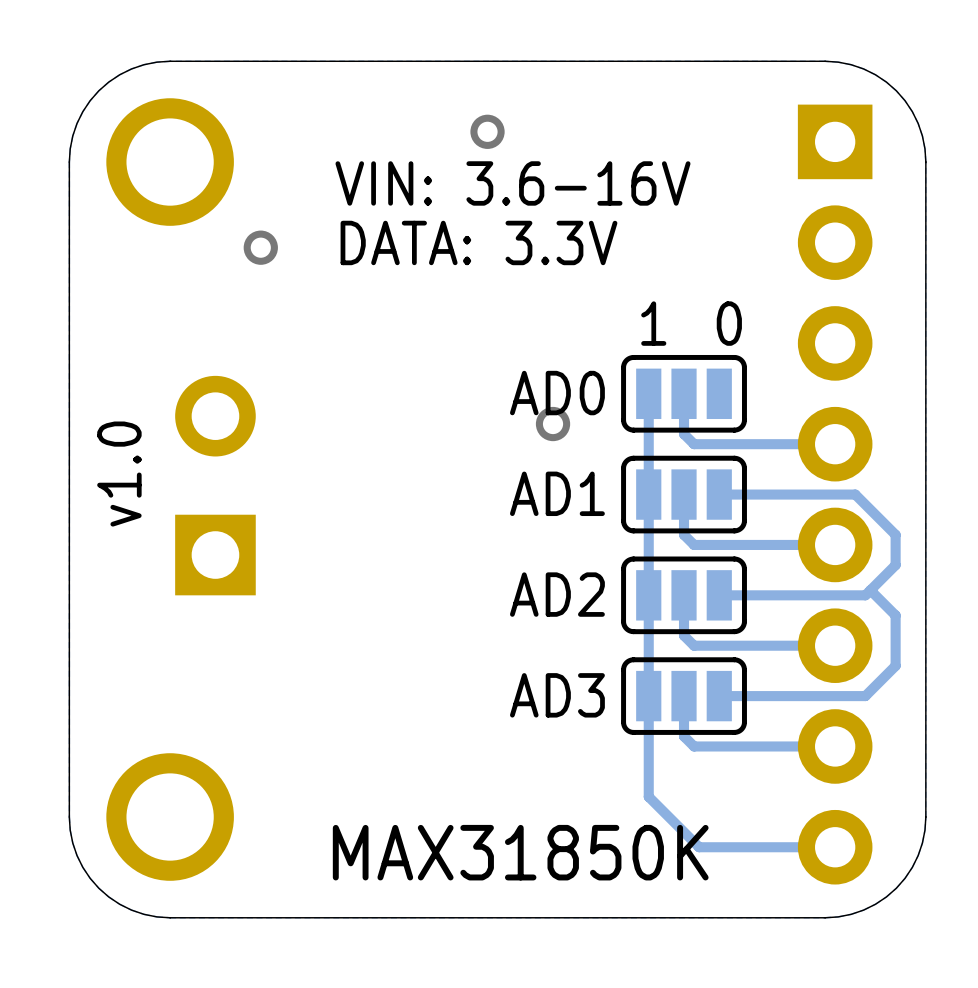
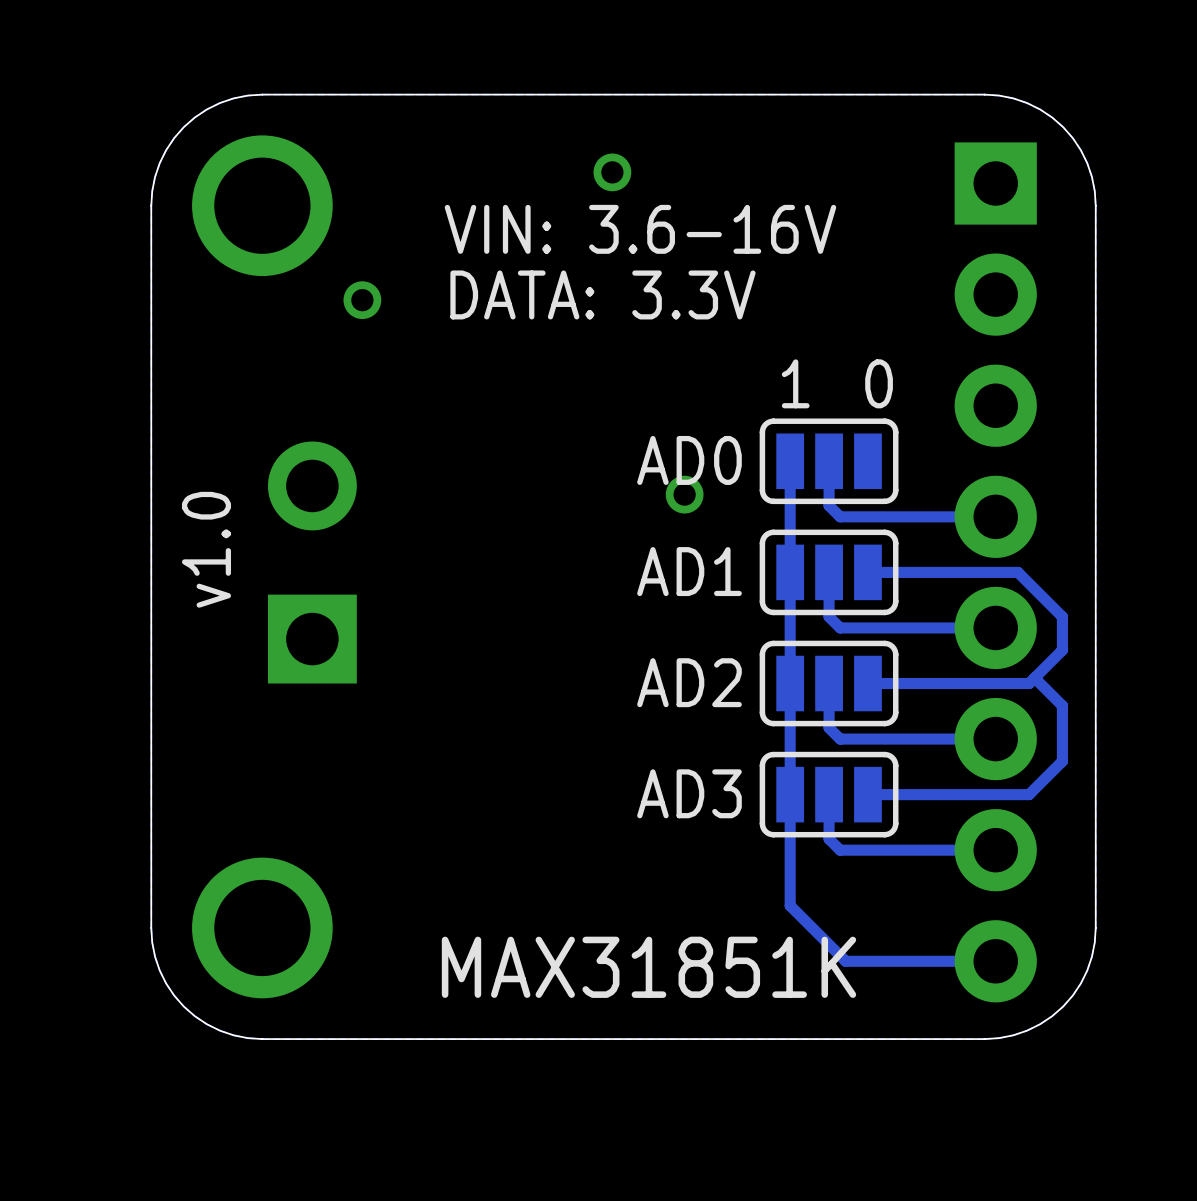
text: MAX31850K (520, 852) -> MAX31851K (648, 967)

